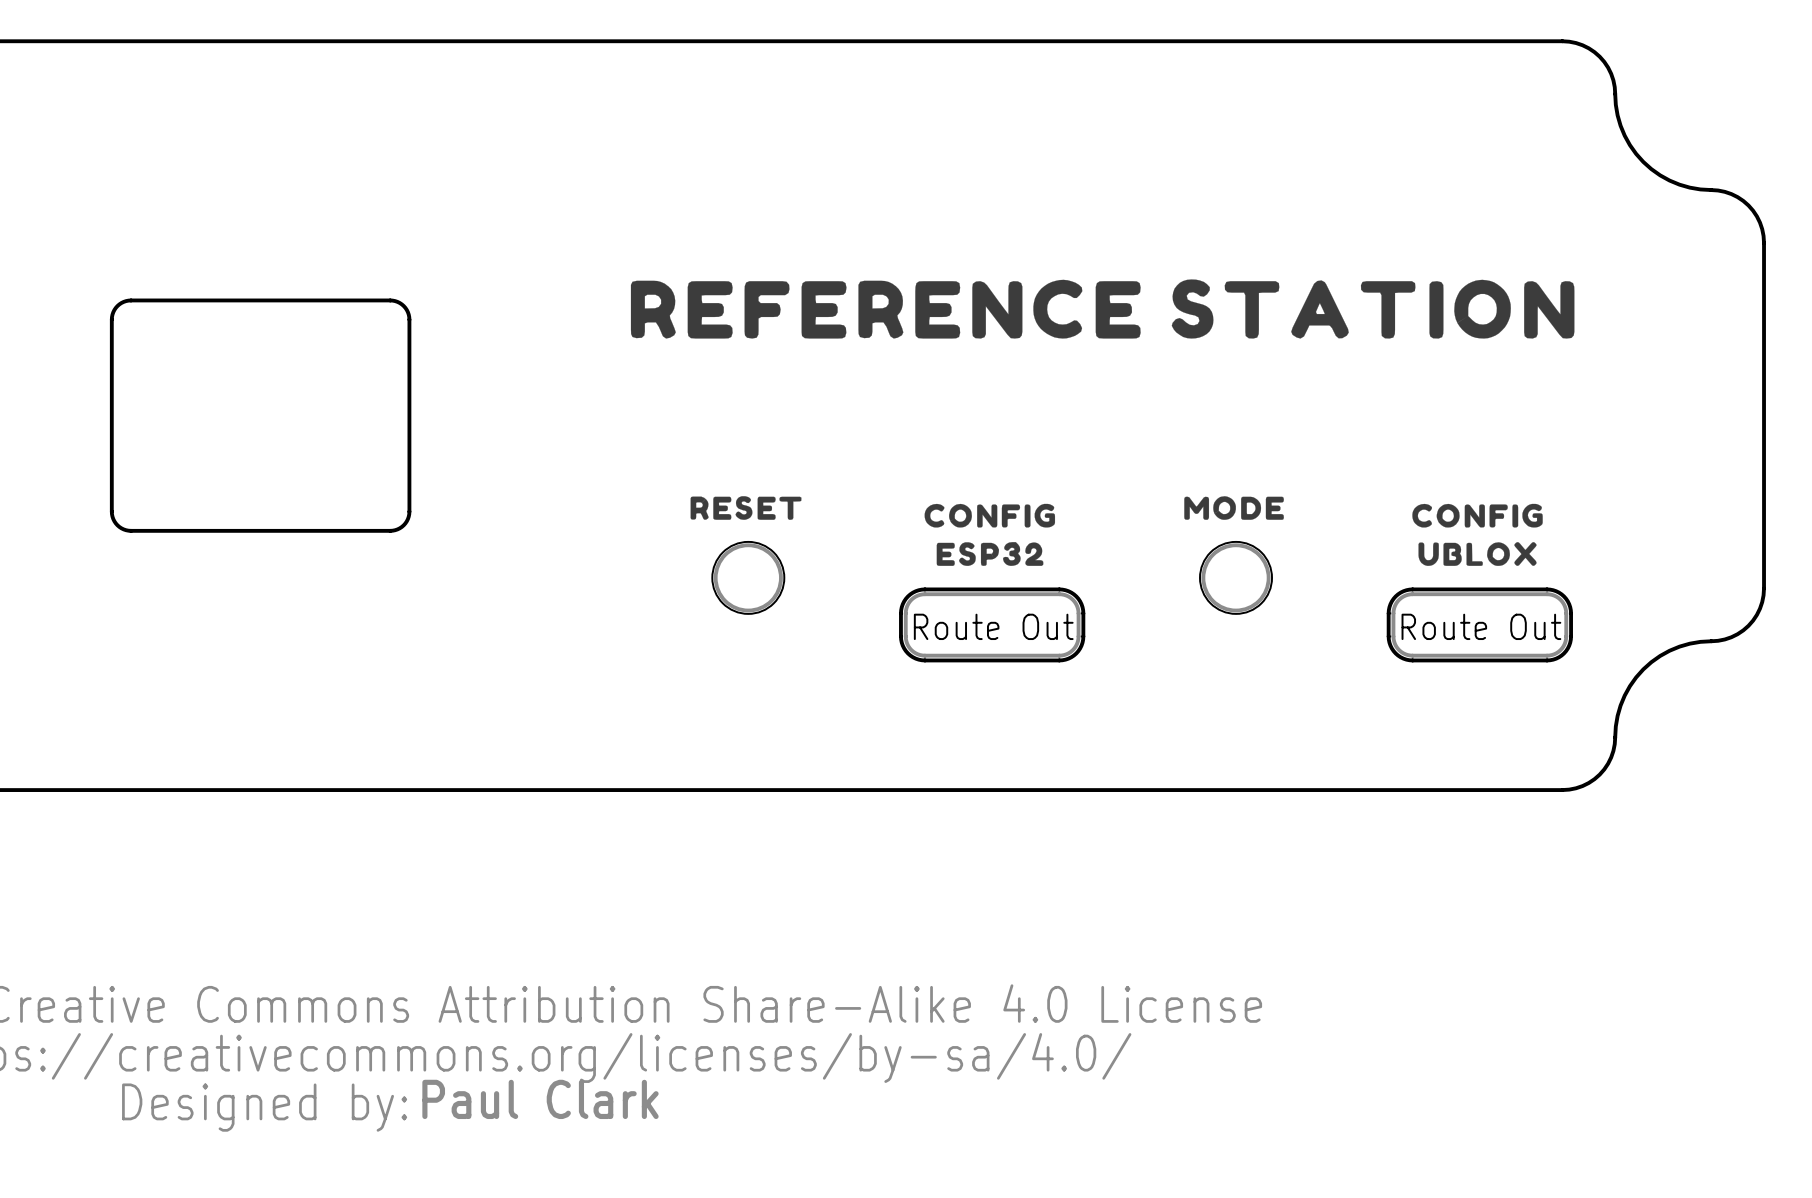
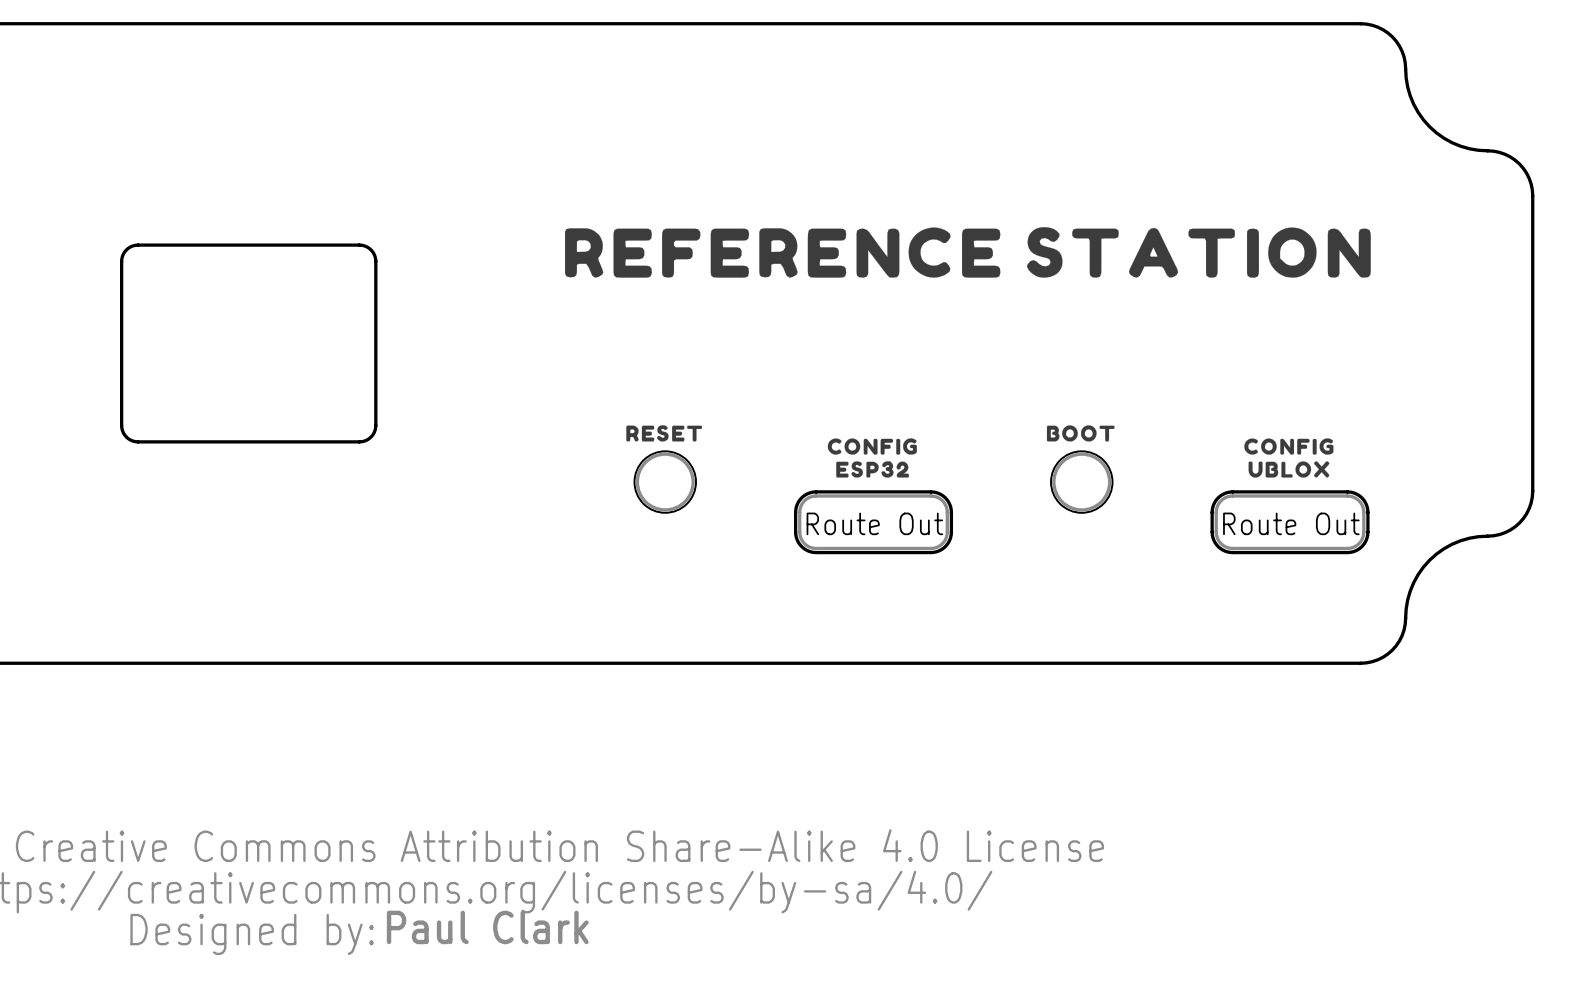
drawing shape: [690, 496, 802, 520] -> [626, 425, 703, 442]
drawing shape: [1184, 496, 1284, 520] -> [1046, 425, 1115, 442]
drawing: [924, 503, 1056, 566] -> none
drawing: [1412, 503, 1543, 566] -> none
drawing: none -> [827, 438, 917, 478]
drawing: none -> [1244, 438, 1334, 478]

